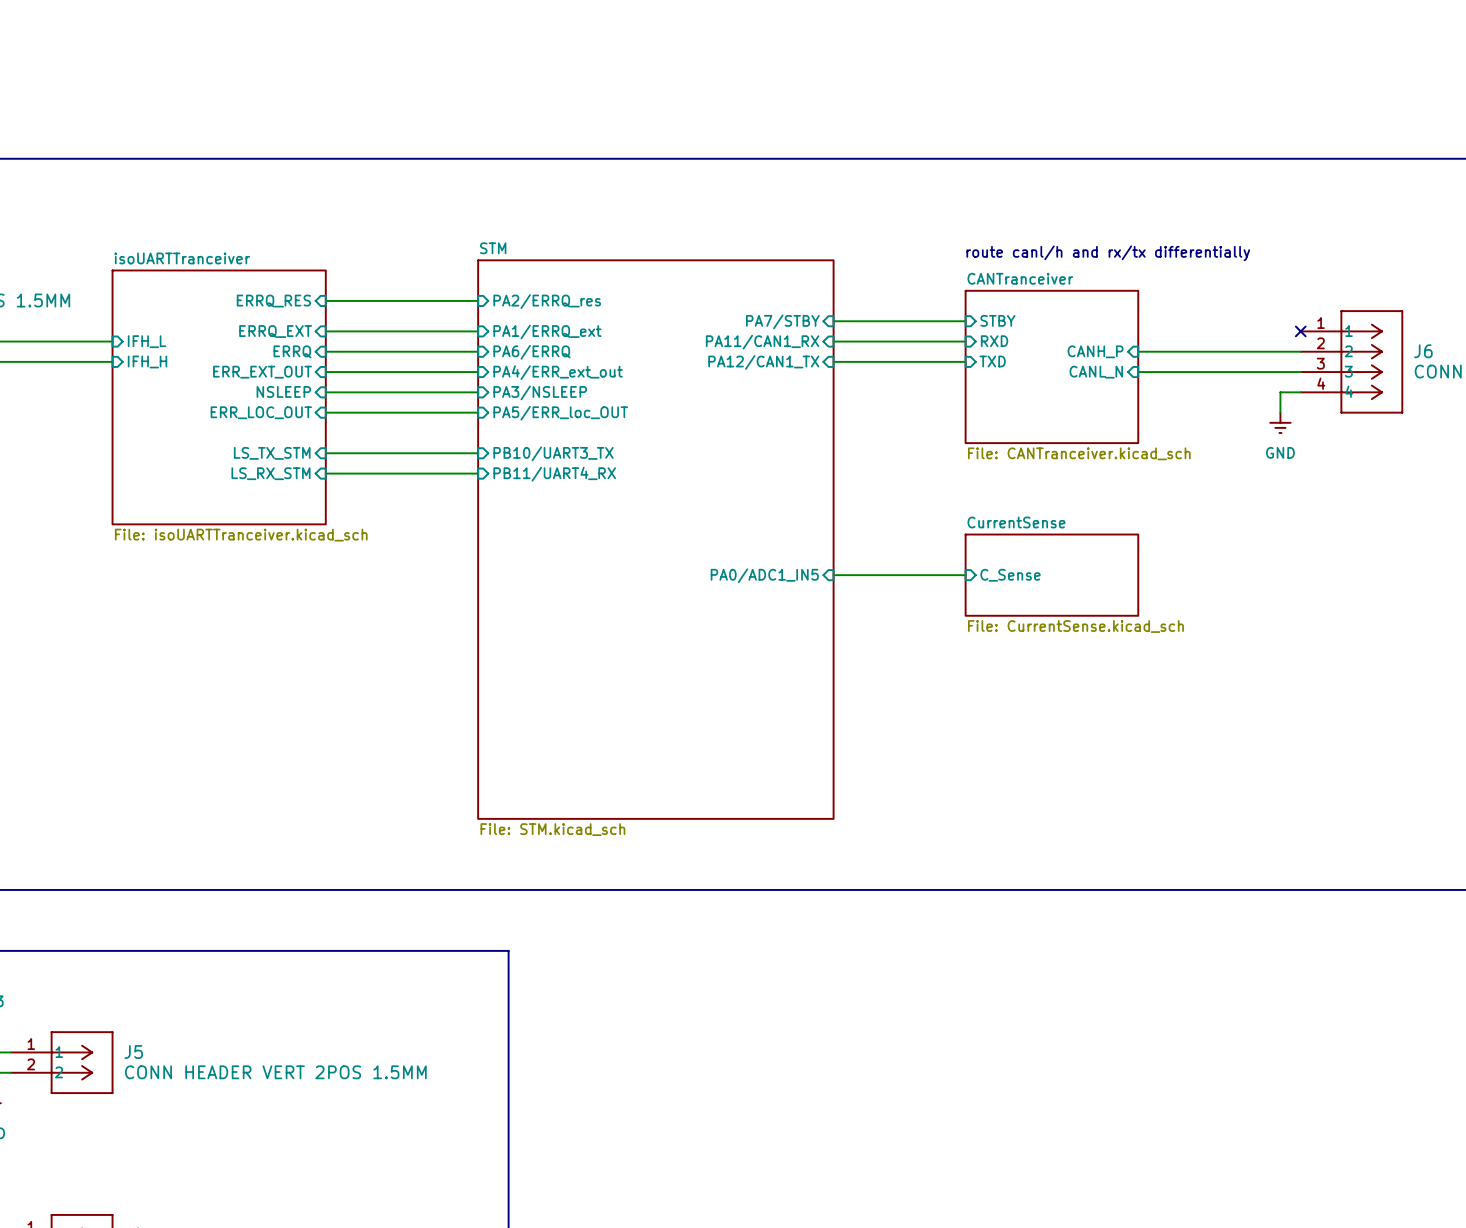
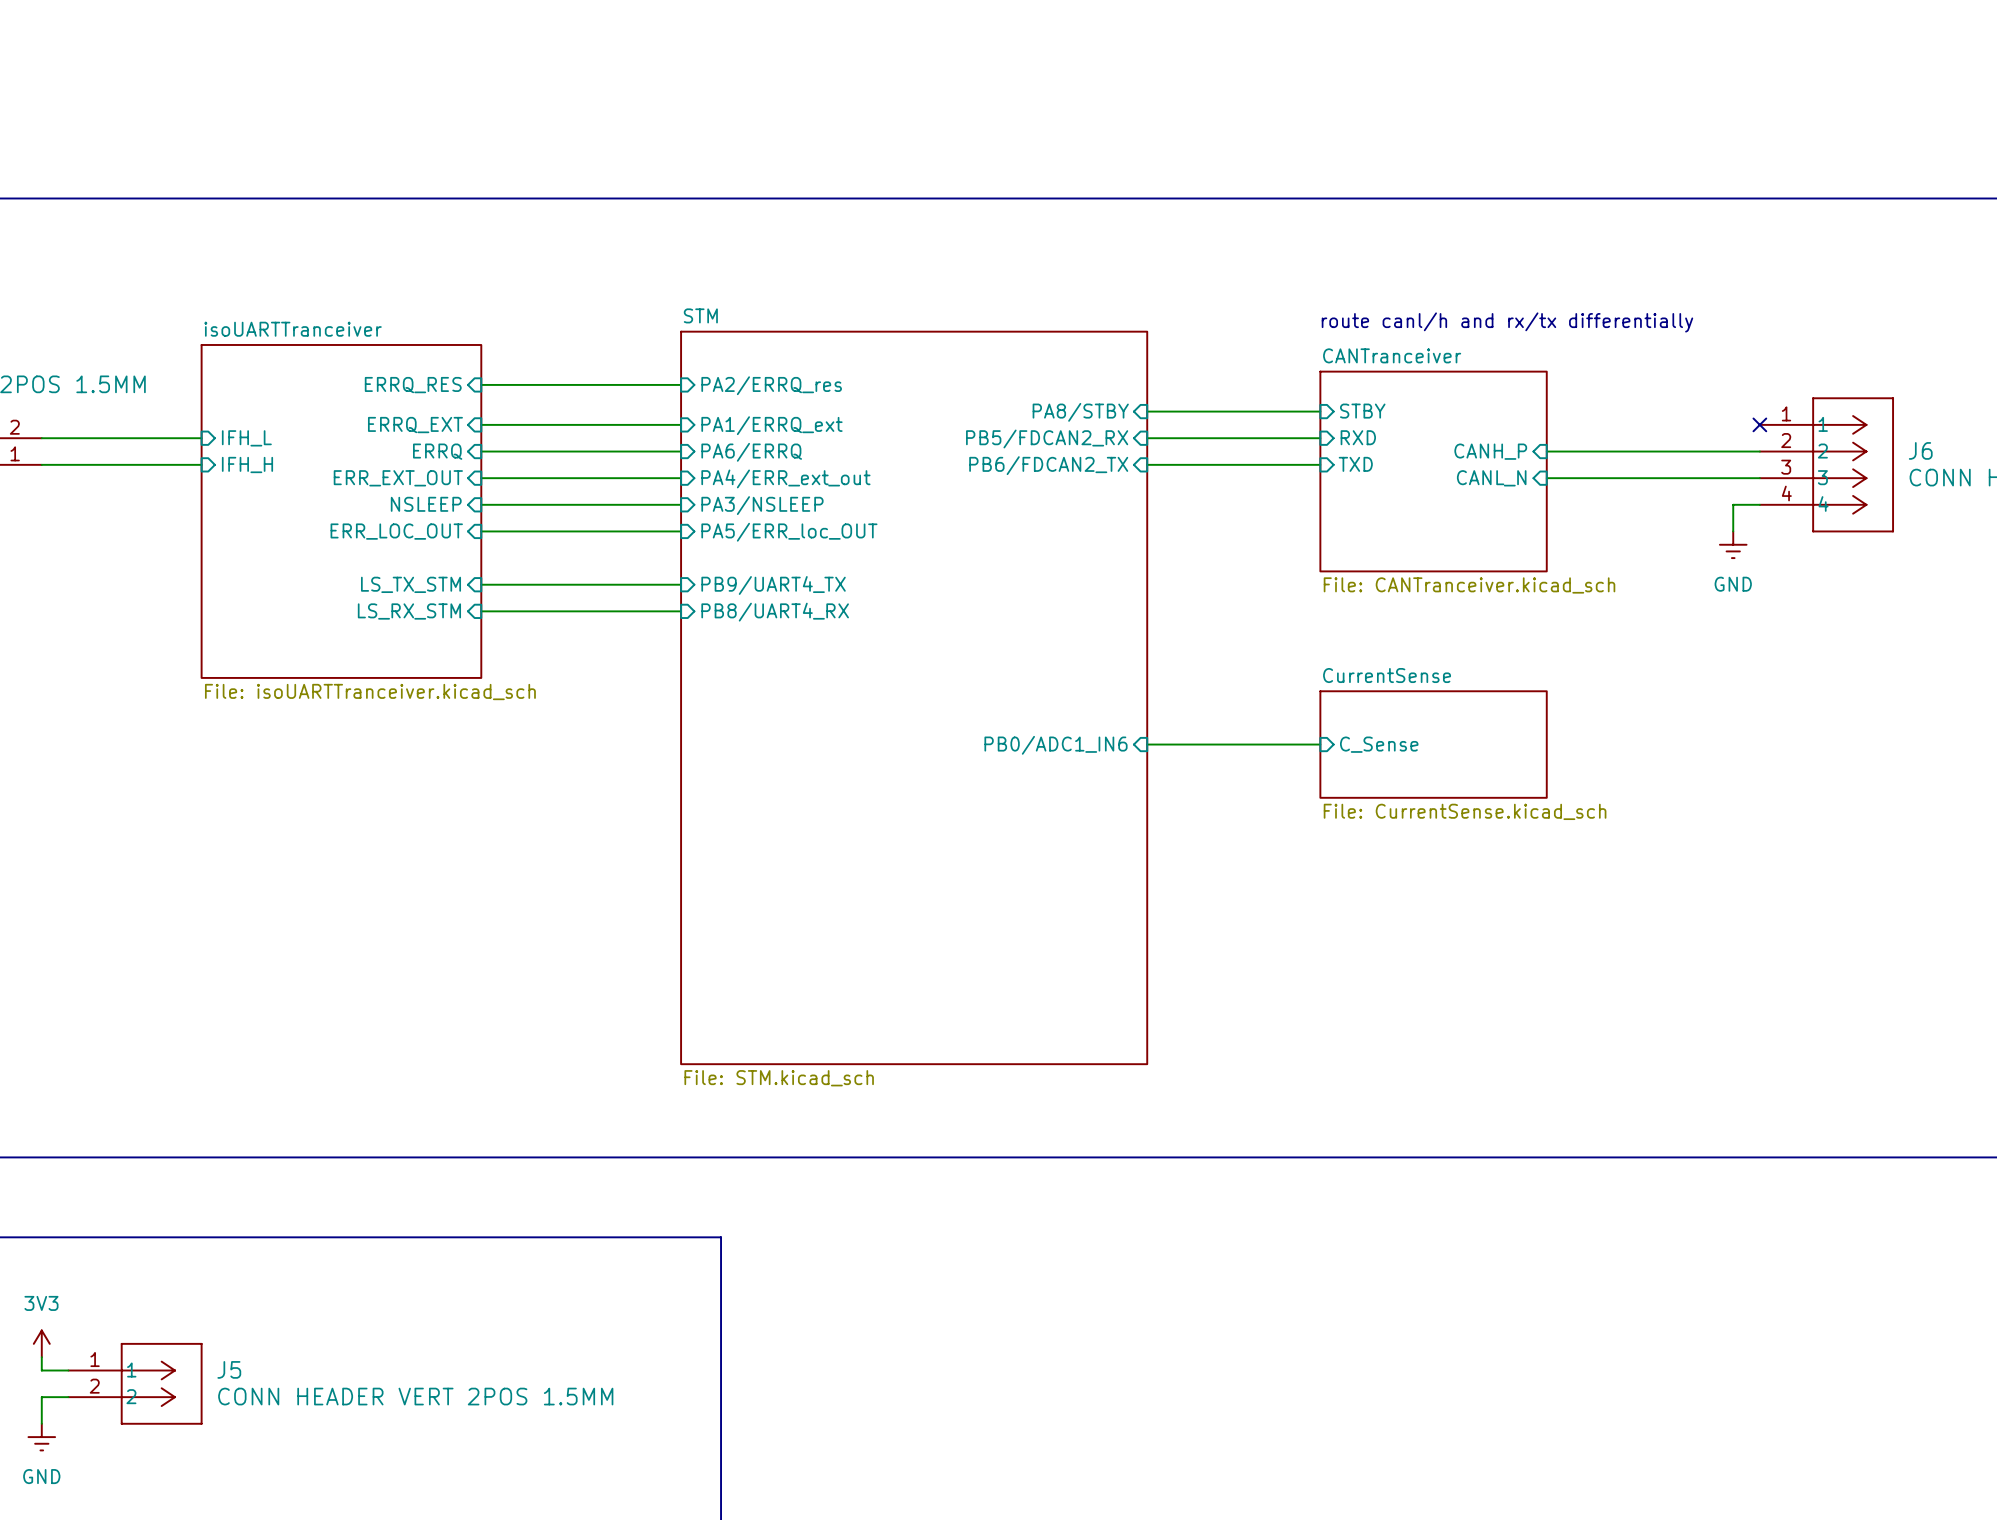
sheet pin: PA7/STBY (782, 321) -> PA8/STBY (1080, 412)
sheet pin: PA11/CAN1_RX (762, 342) -> PB5/FDCAN2_RX (1047, 438)
sheet pin: PA12/CAN1_TX (763, 362) -> PB6/FDCAN2_TX (1048, 465)
sheet pin: PB10/UART3_TX (553, 453) -> PB9/UART4_TX (773, 585)
sheet pin: PB11/UART4_RX (554, 474) -> PB8/UART4_RX (775, 612)
sheet pin: PA0/ADC1_IN5 (764, 575) -> PB0/ADC1_IN6 (1056, 745)

